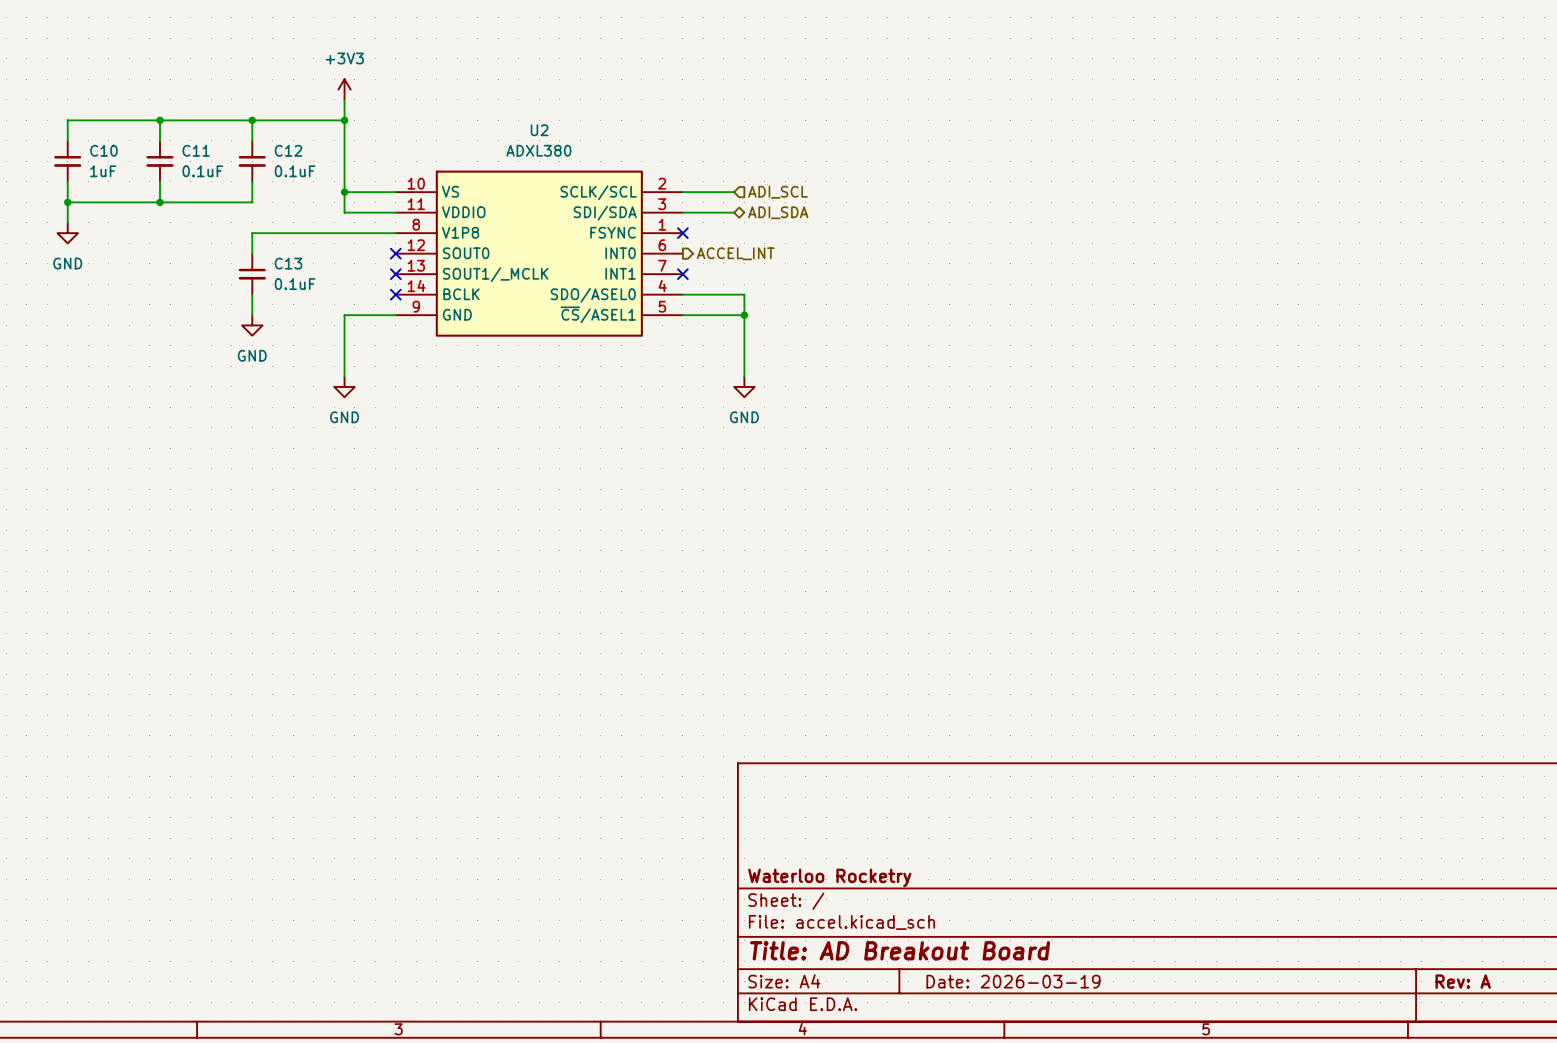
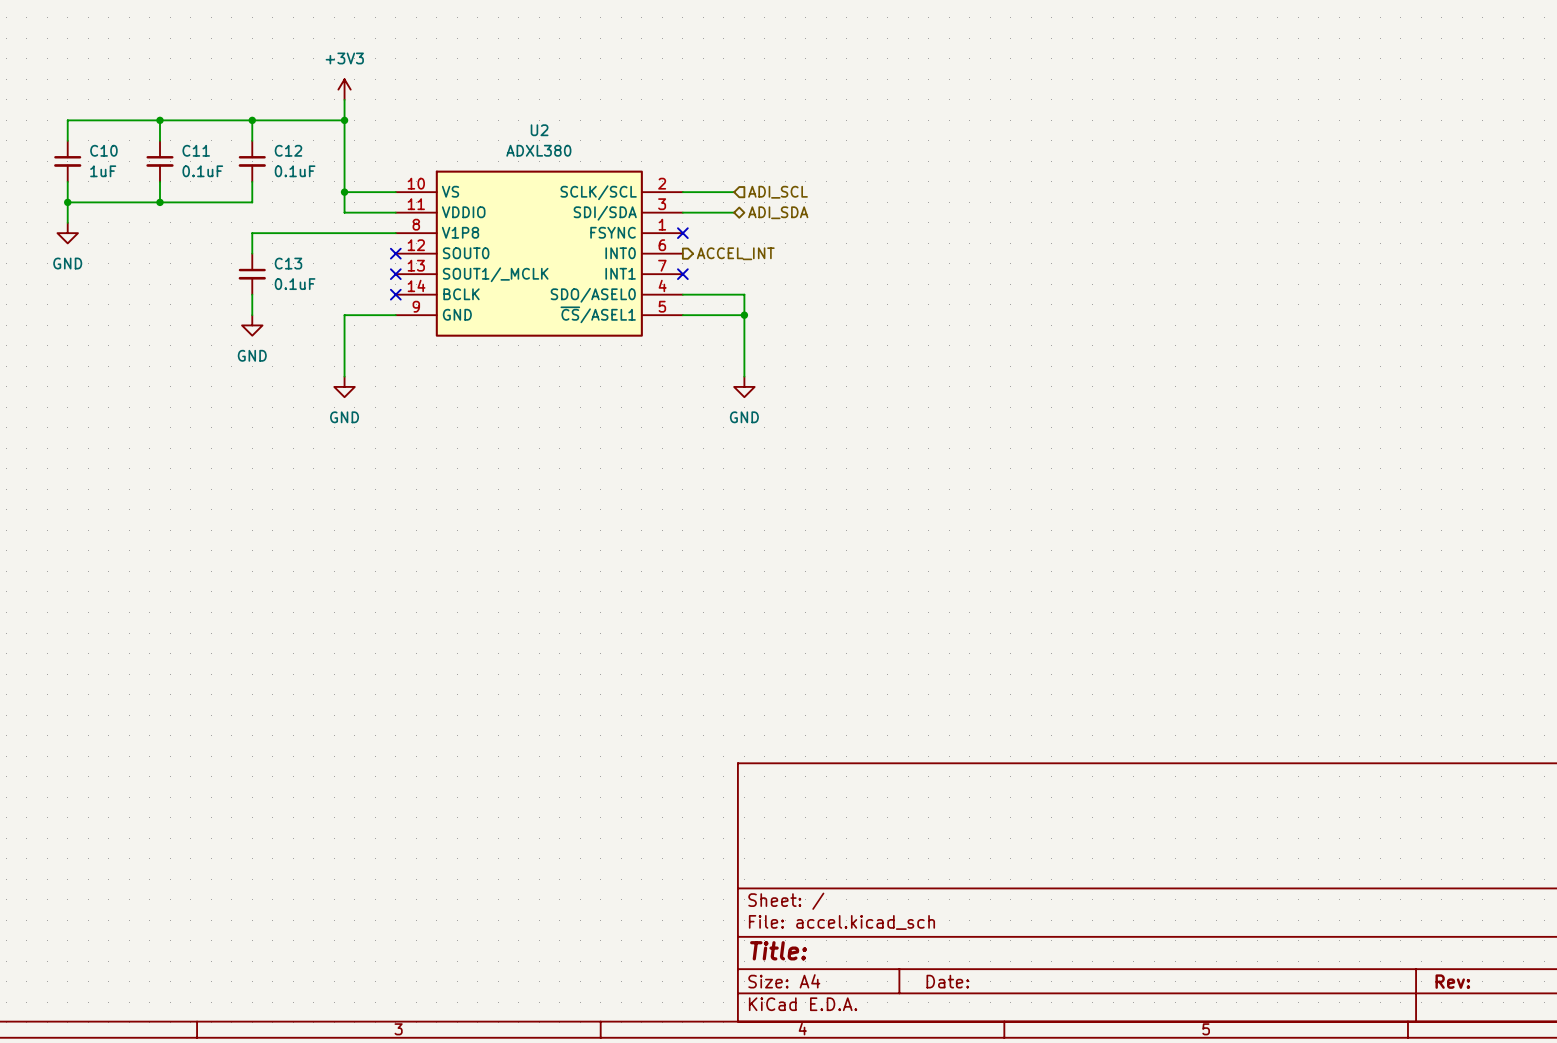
title block: Waterloo Rocketry (829, 877) -> none
title block: Title: AD Breakout Board (900, 950) -> Title: (778, 950)
title block: Date: 2026-03-19 (1013, 981) -> Date: (947, 981)
title block: Rev: A (1463, 981) -> Rev: (1452, 981)

